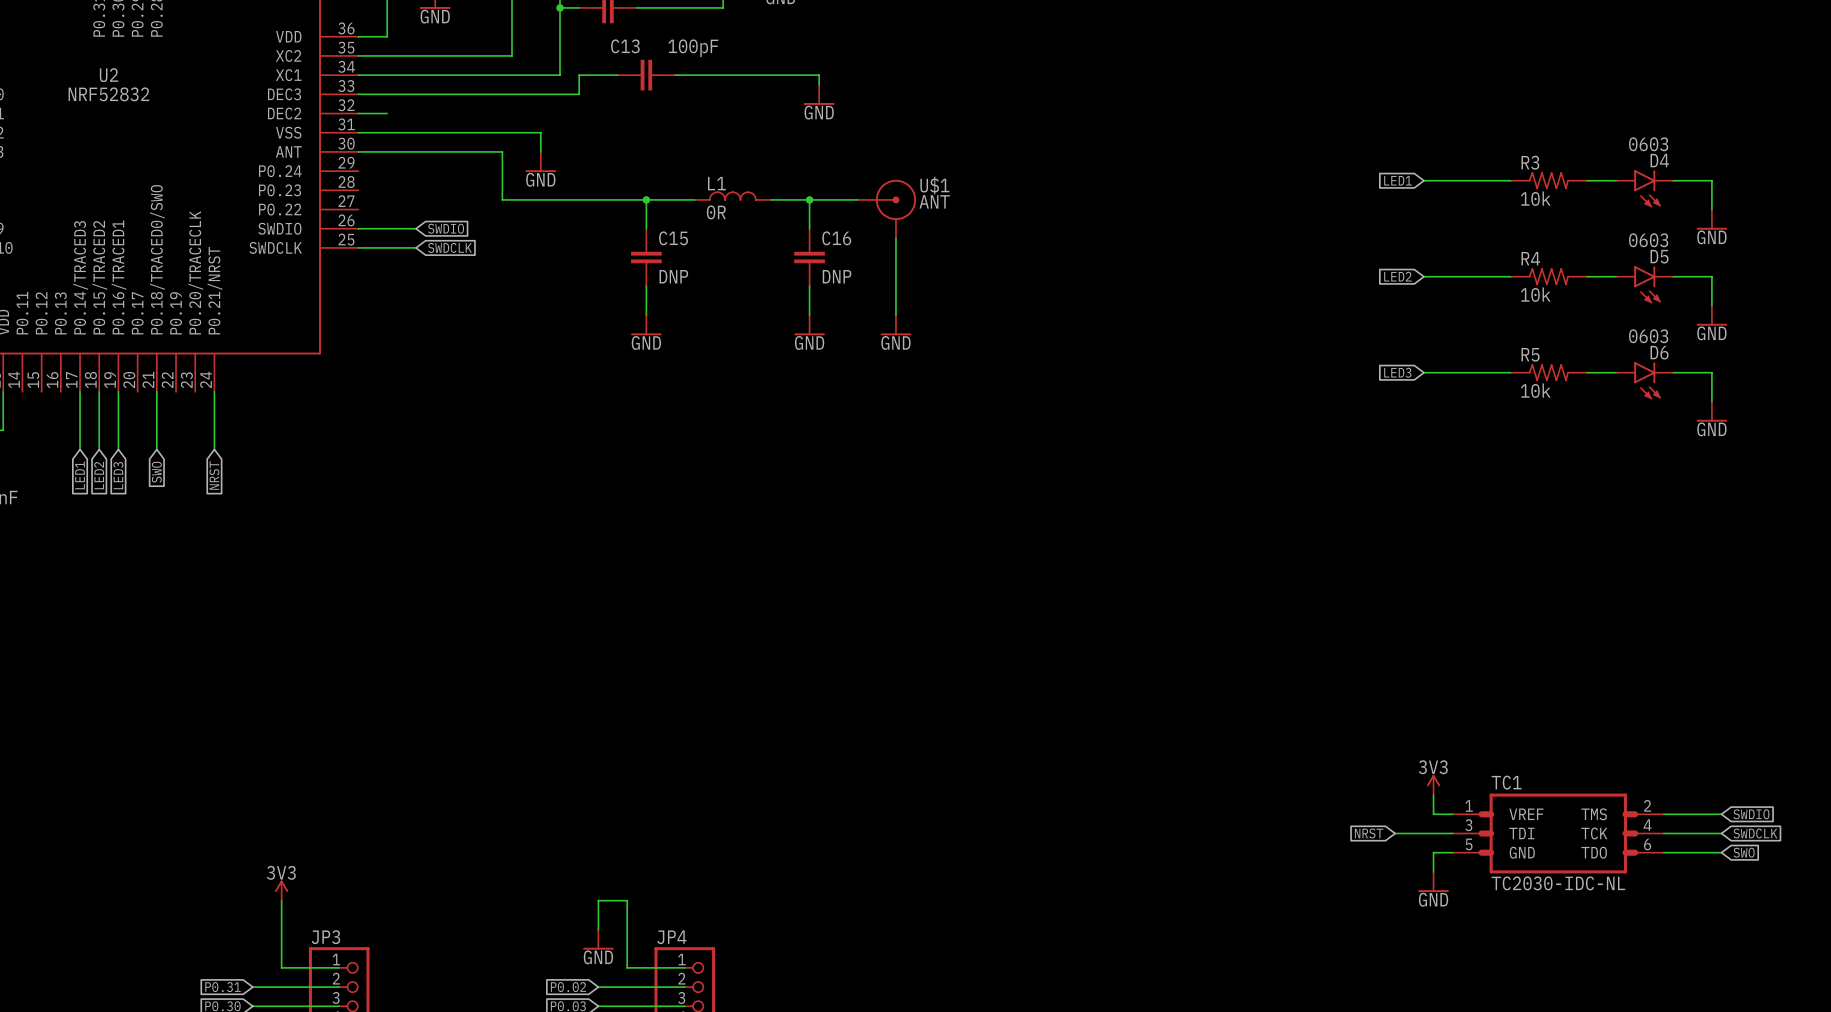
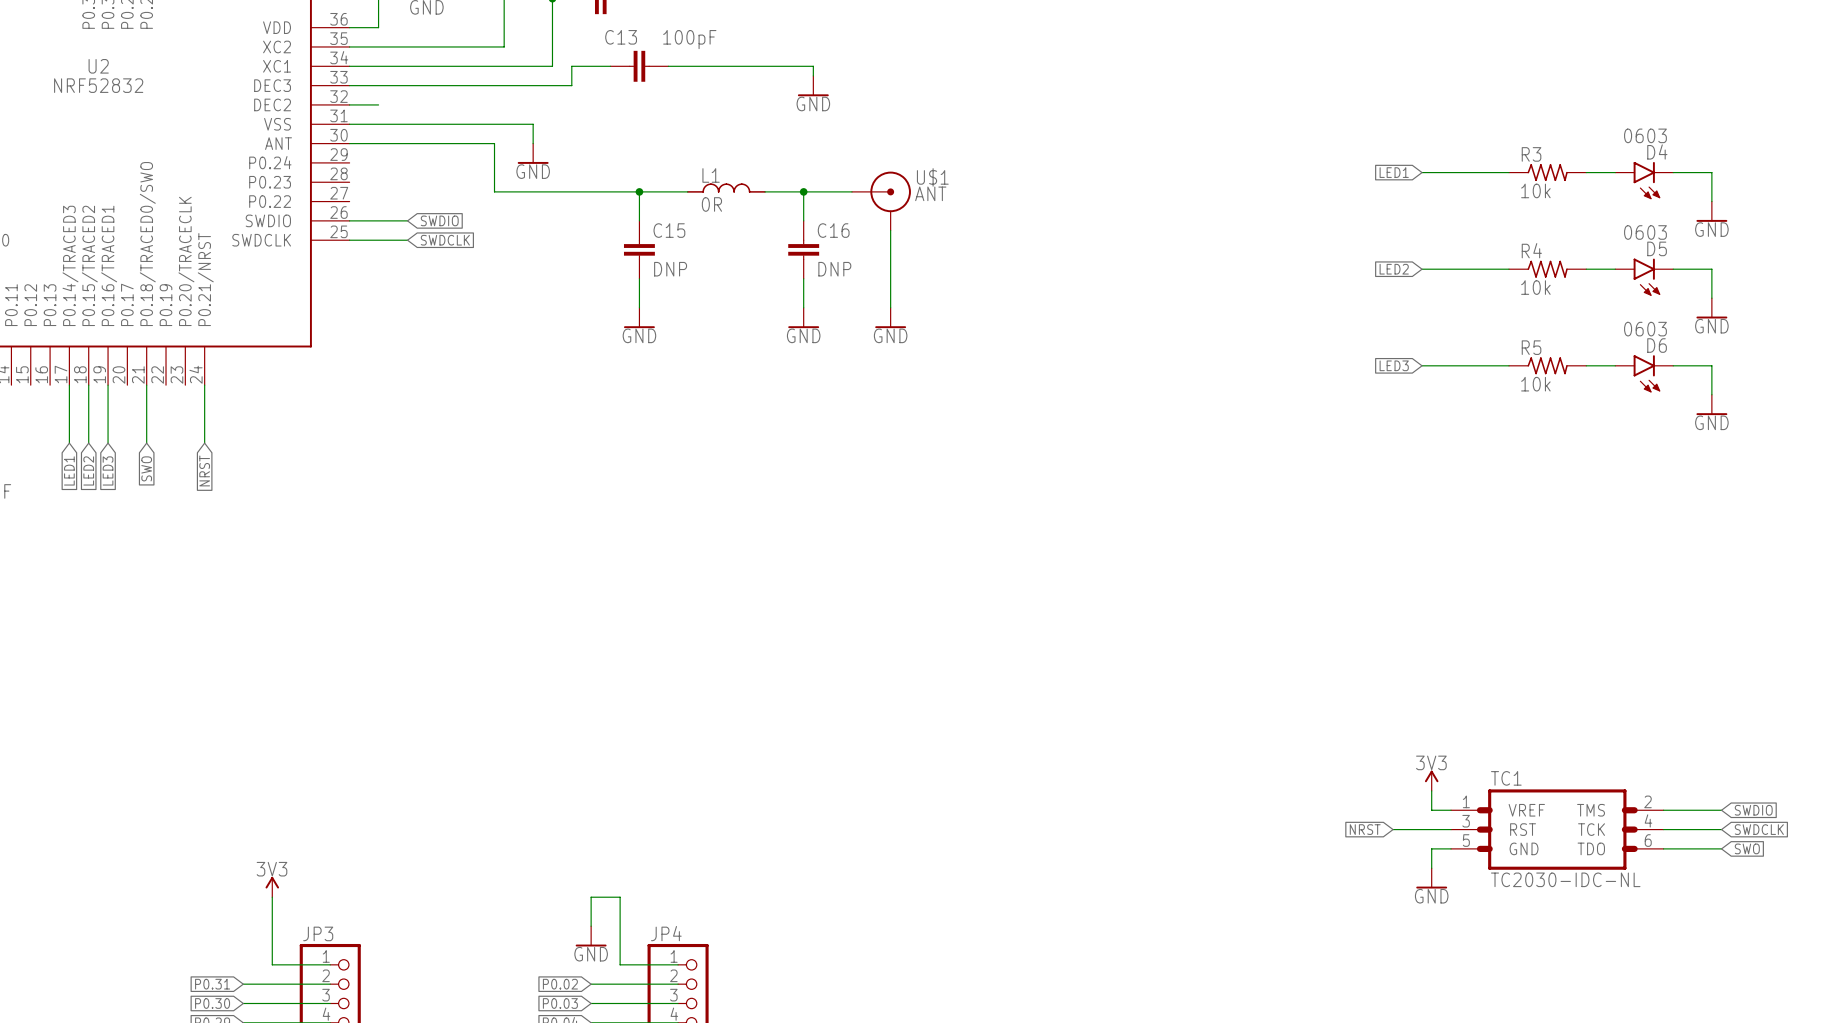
TC1 pin name: TDI (1521, 833) -> RST (1523, 829)

